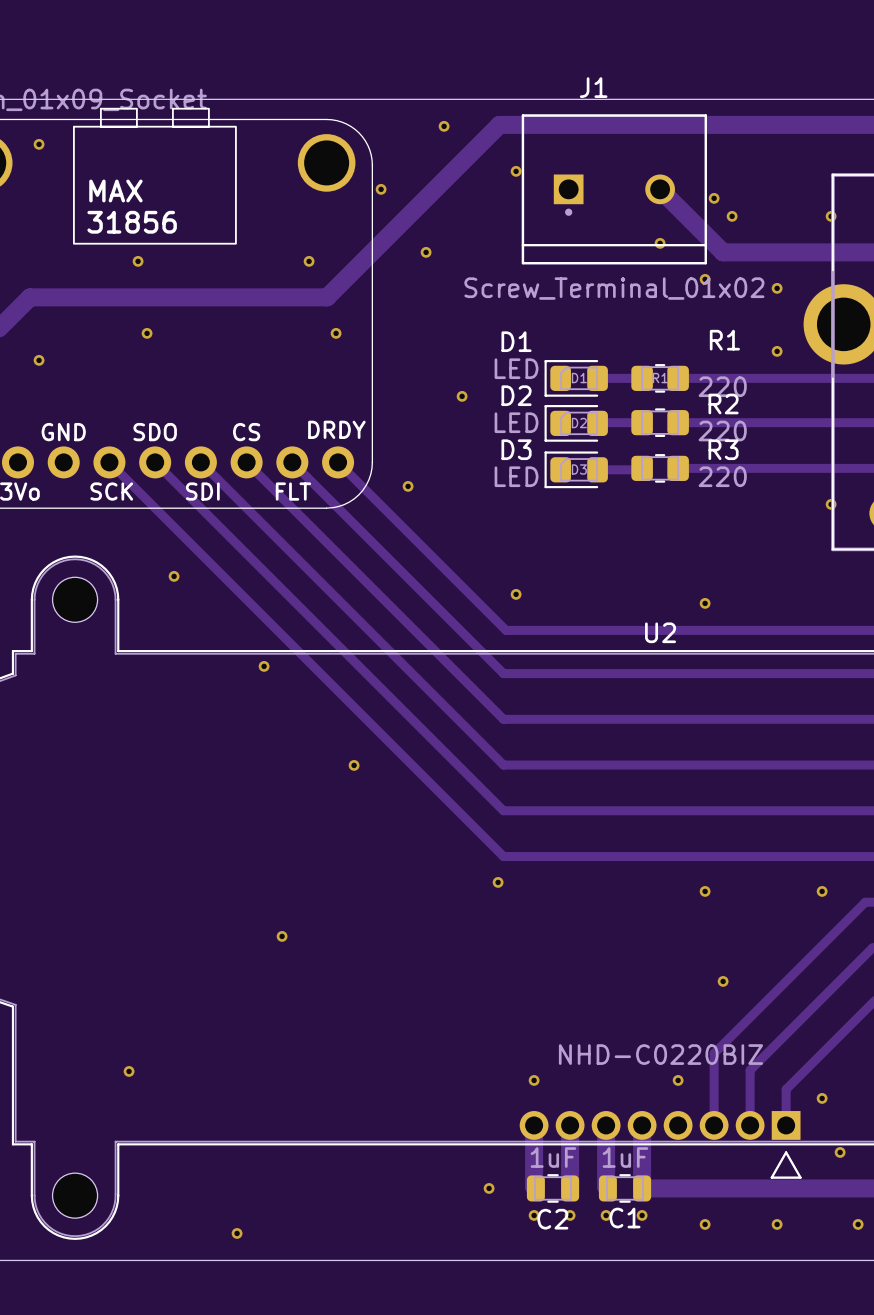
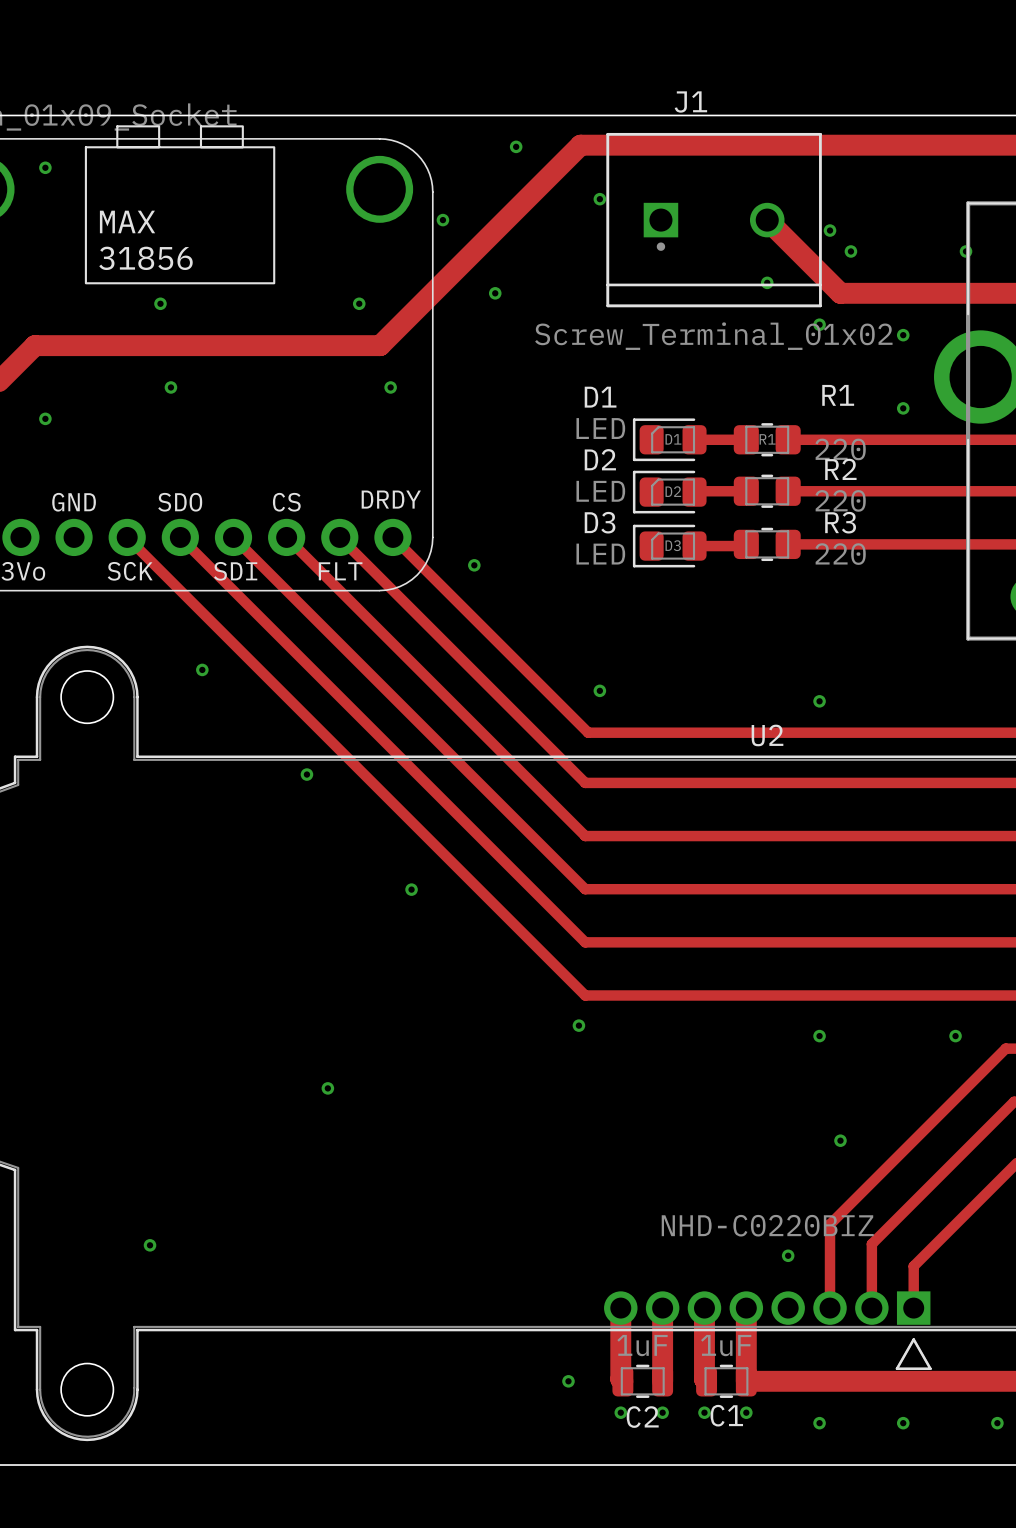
via: (462, 396) -> none
via: (831, 504) -> none
via: (534, 1080) -> none
via: (822, 1098) -> none
via: (840, 1152) -> none
via: (237, 1233) -> none

